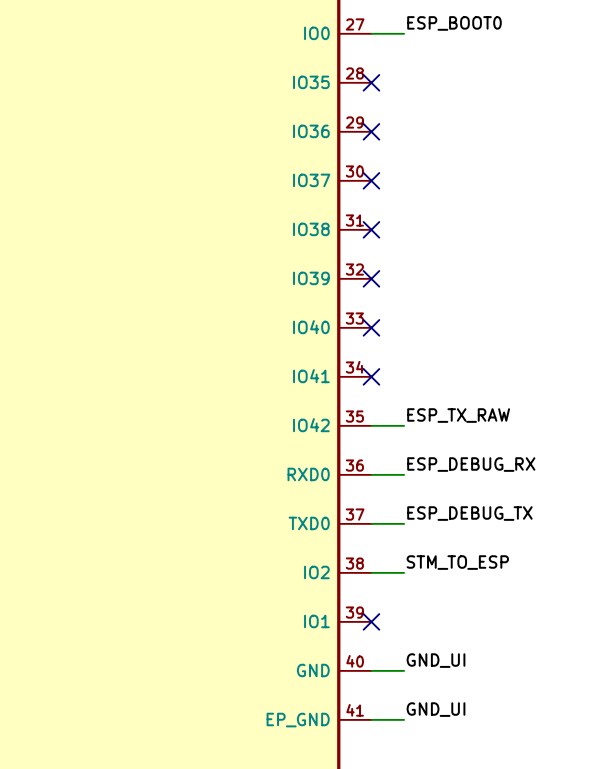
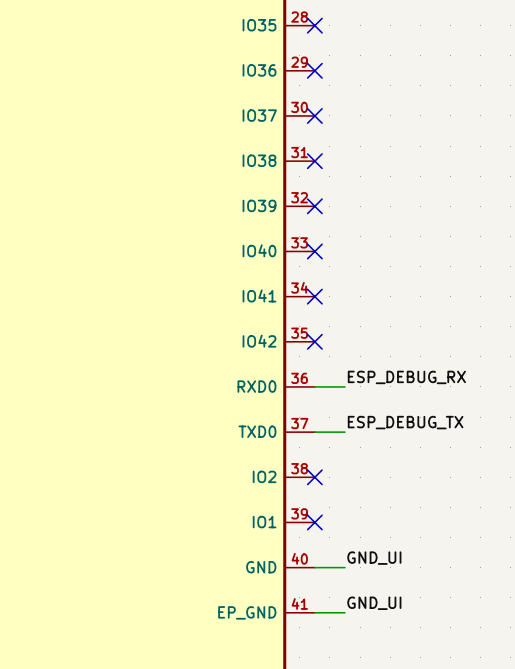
label: ESP_TX_RAW (458, 415) -> none
wire: (371, 425) (404, 425) -> none
no-connect mark: none -> (314, 341)
label: STM_TO_ESP (457, 562) -> none
wire: (371, 572) (404, 572) -> none
no-connect mark: none -> (314, 477)

